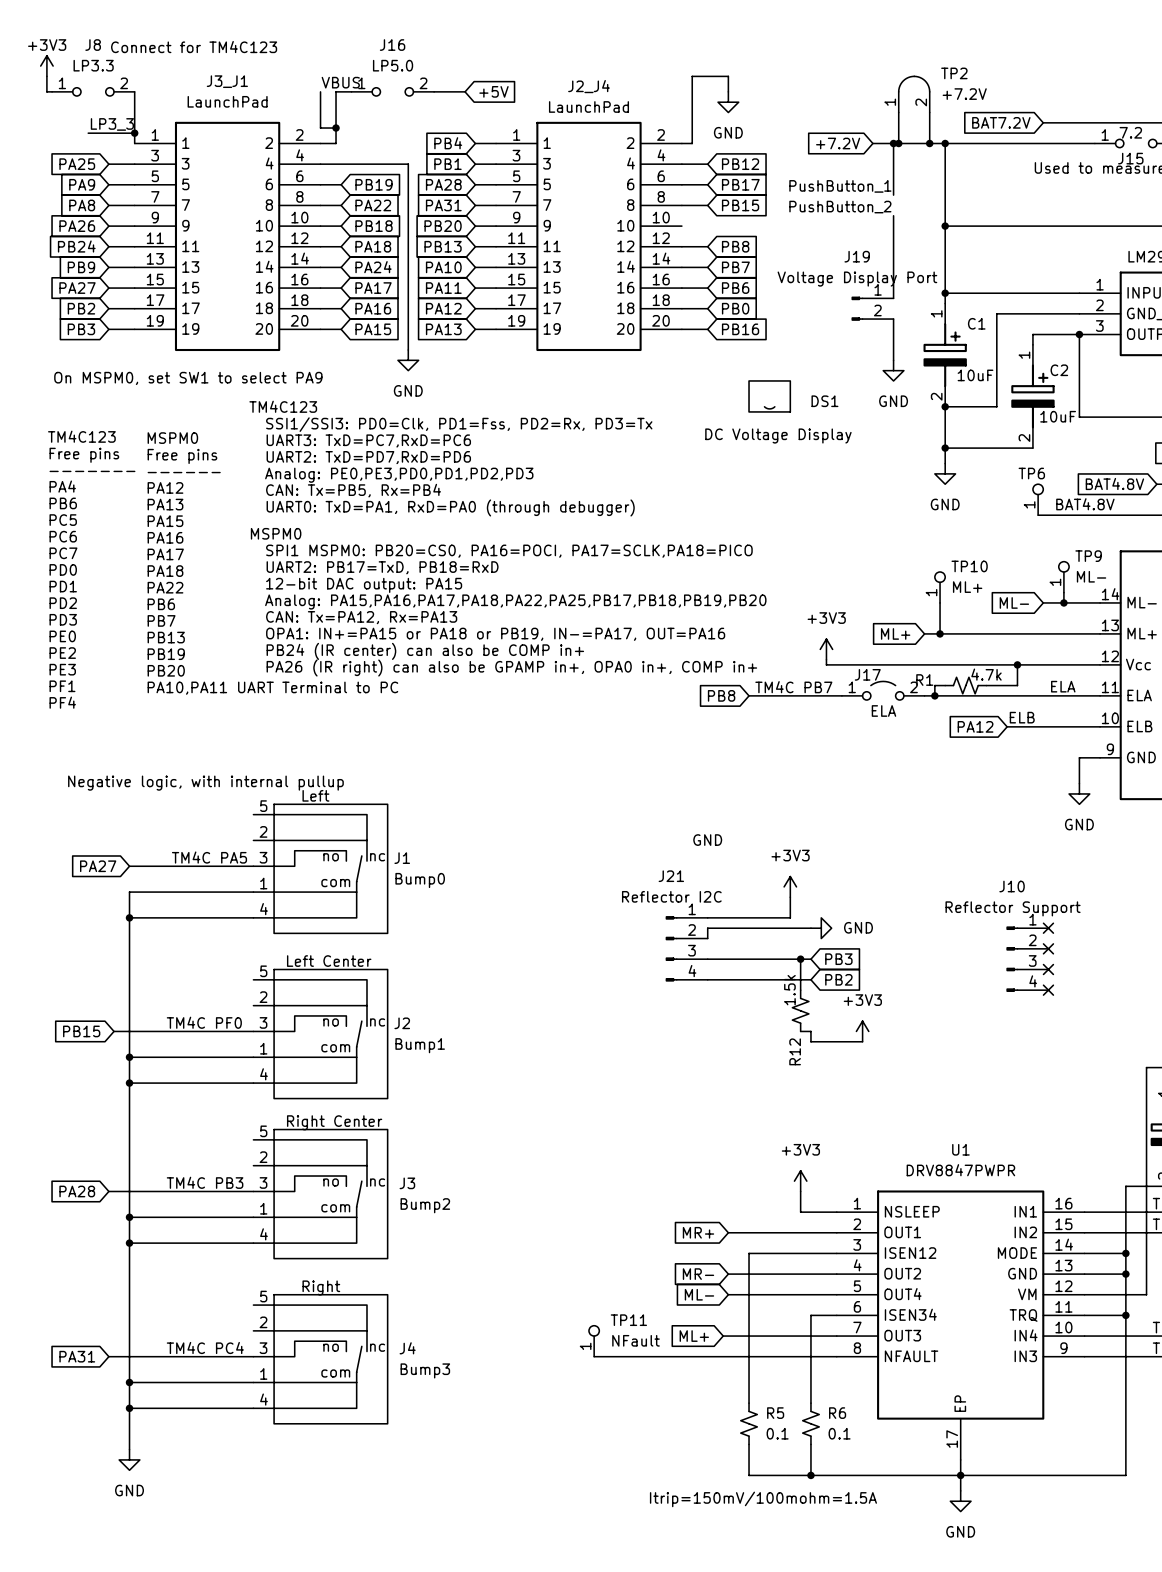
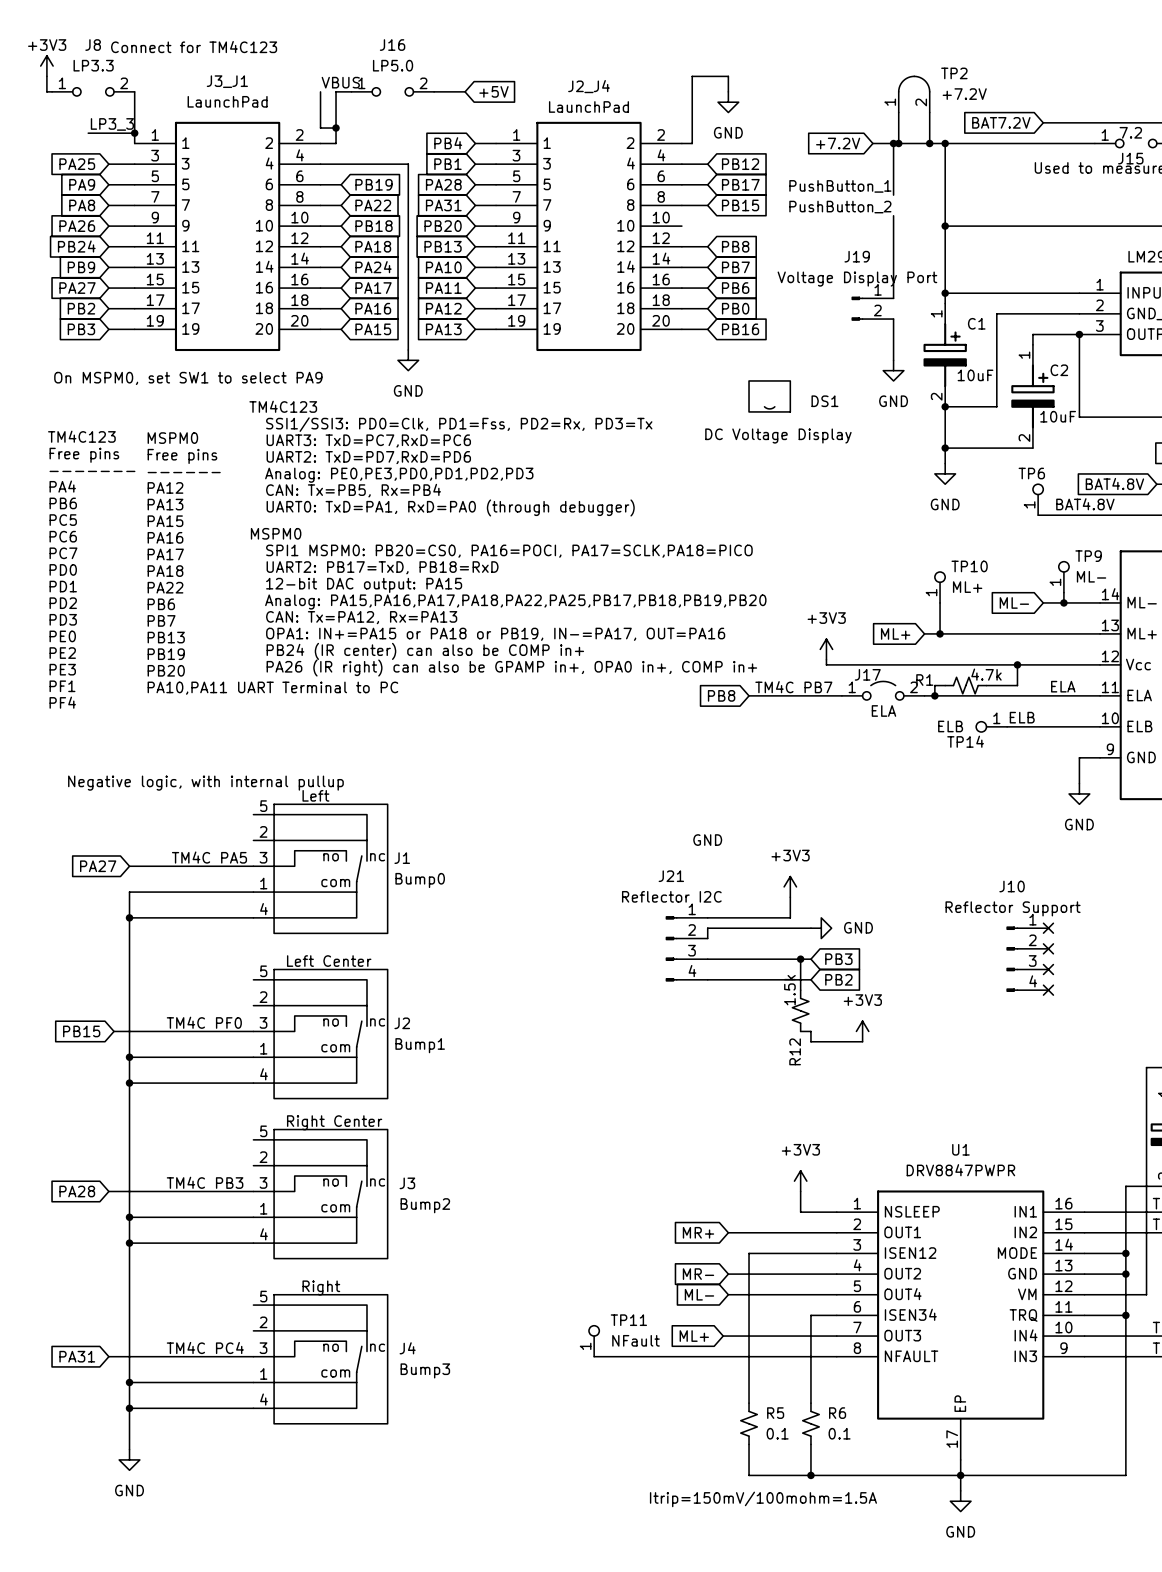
global label: PA12 (975, 726) -> none
TP14: none -> ELB (991, 726)

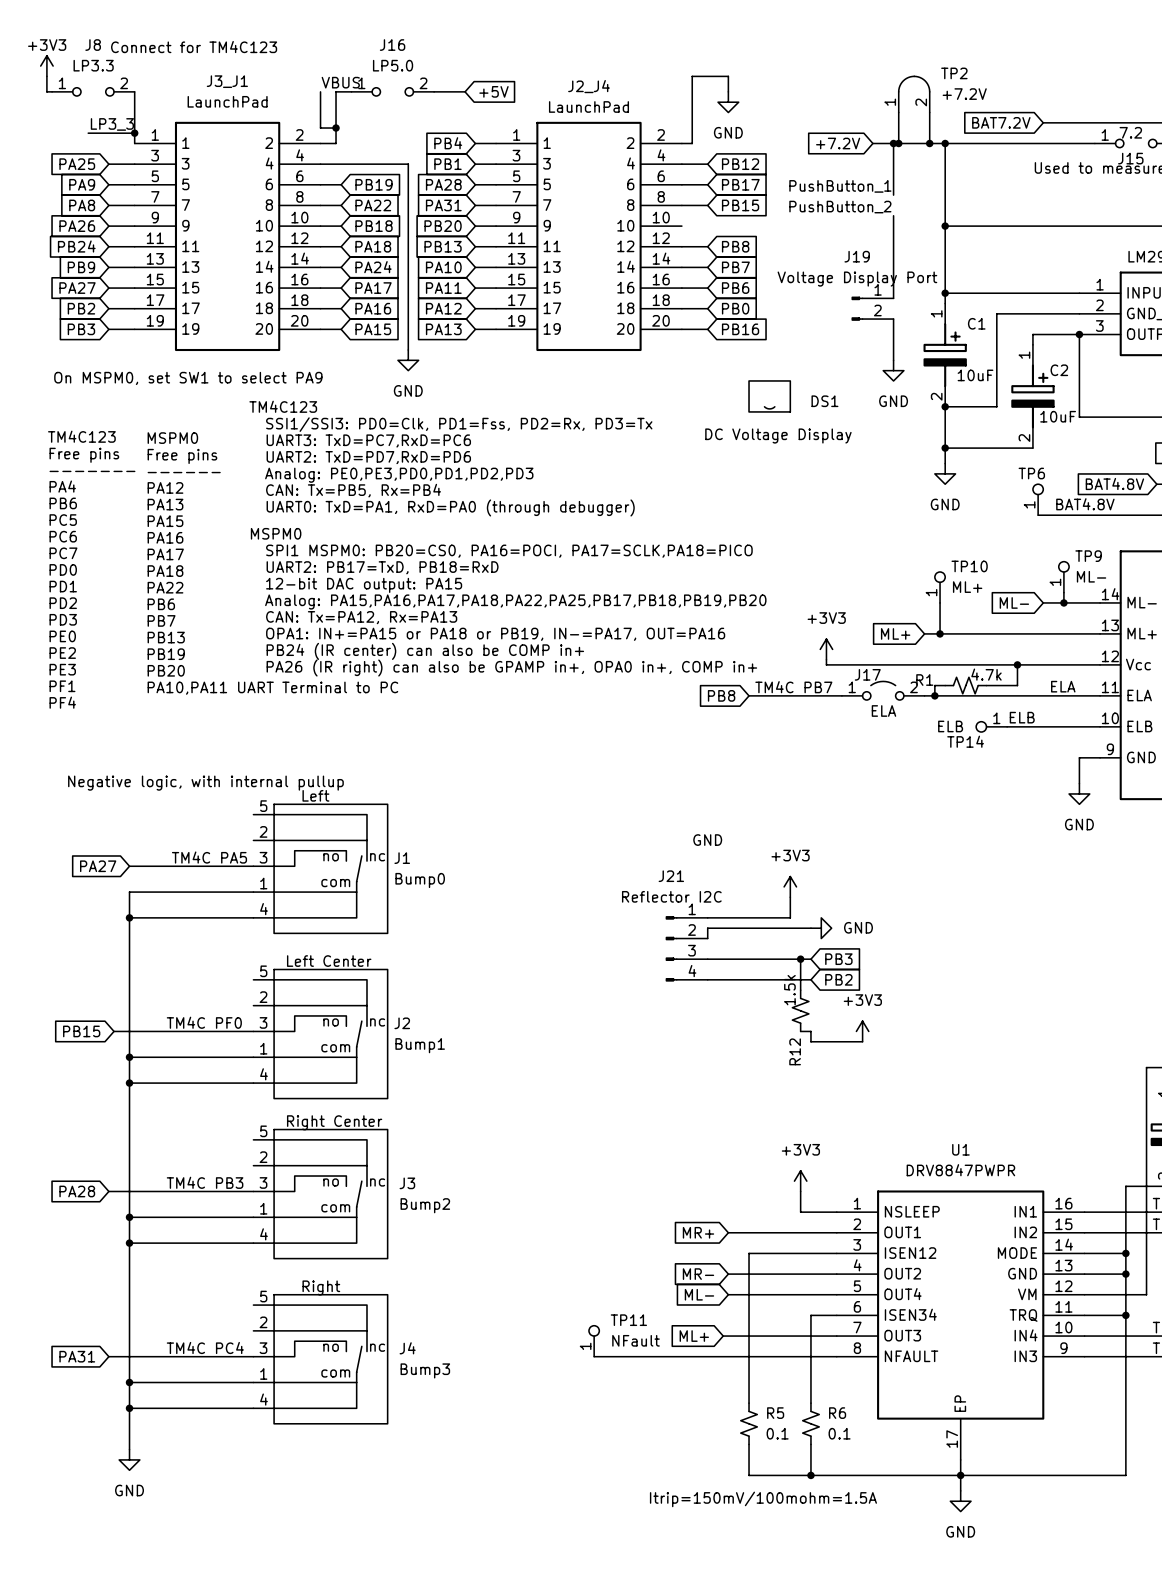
no-connect mark: (1048, 928) -> none
no-connect mark: (1048, 948) -> none
J10: Reflector Support (1027, 959) -> none
no-connect mark: (1048, 969) -> none
no-connect mark: (1048, 990) -> none

